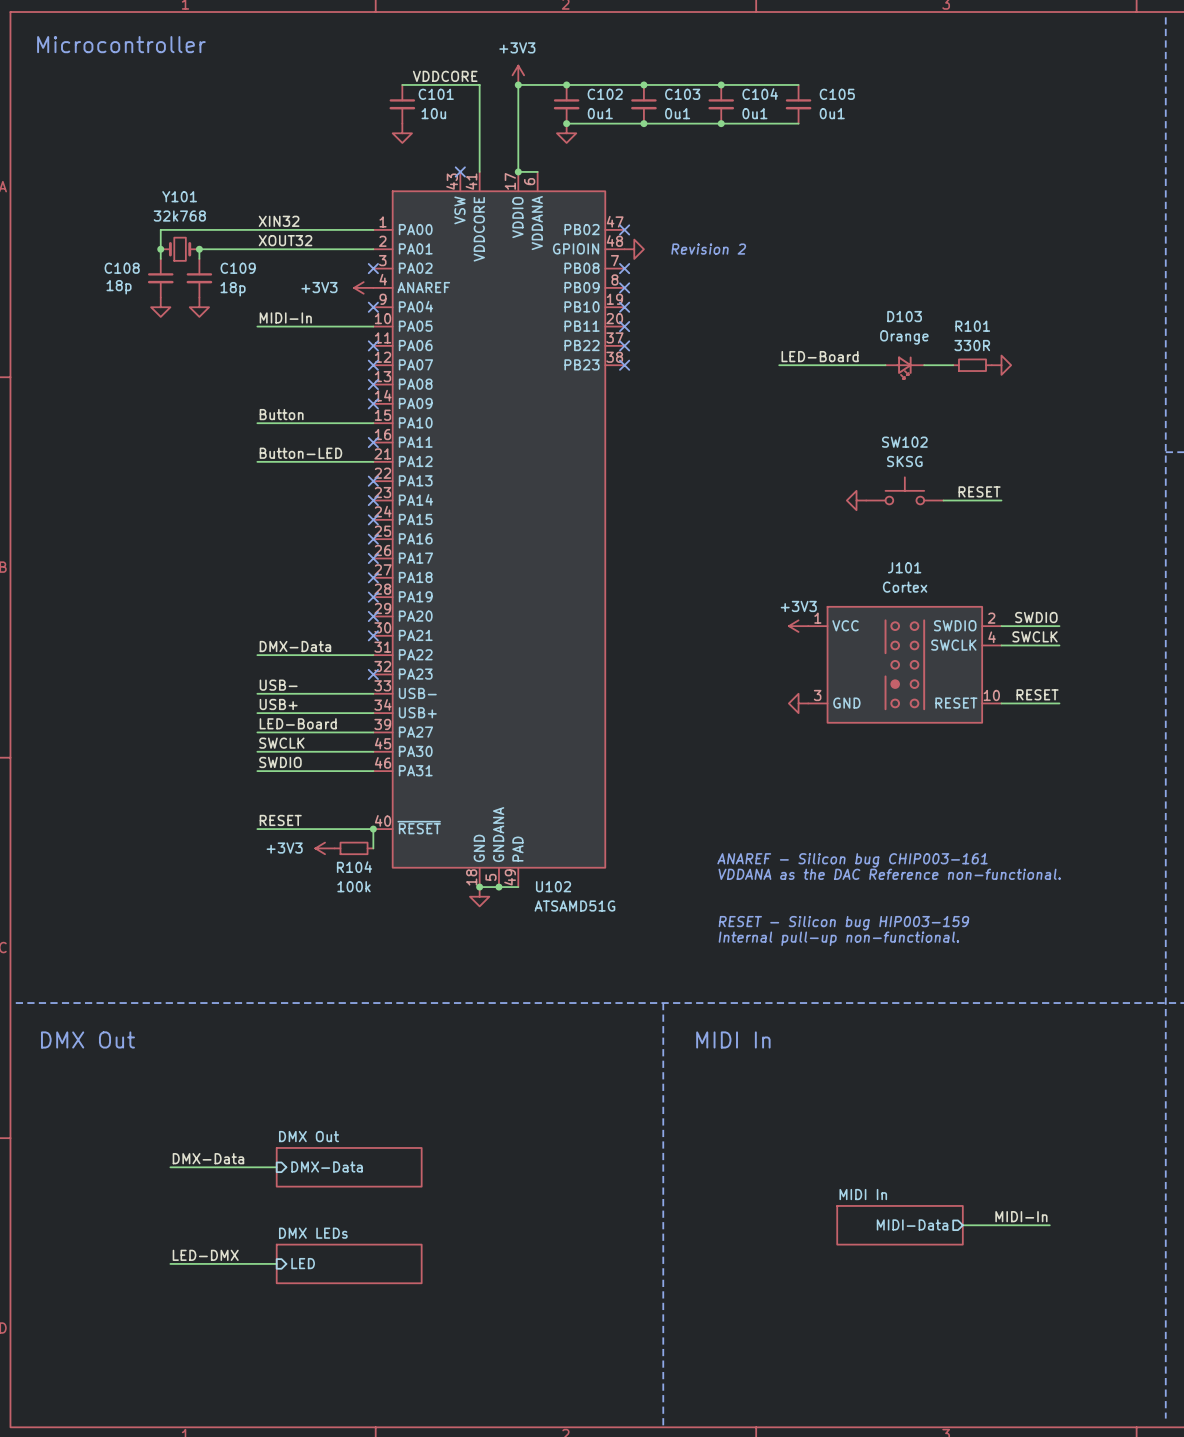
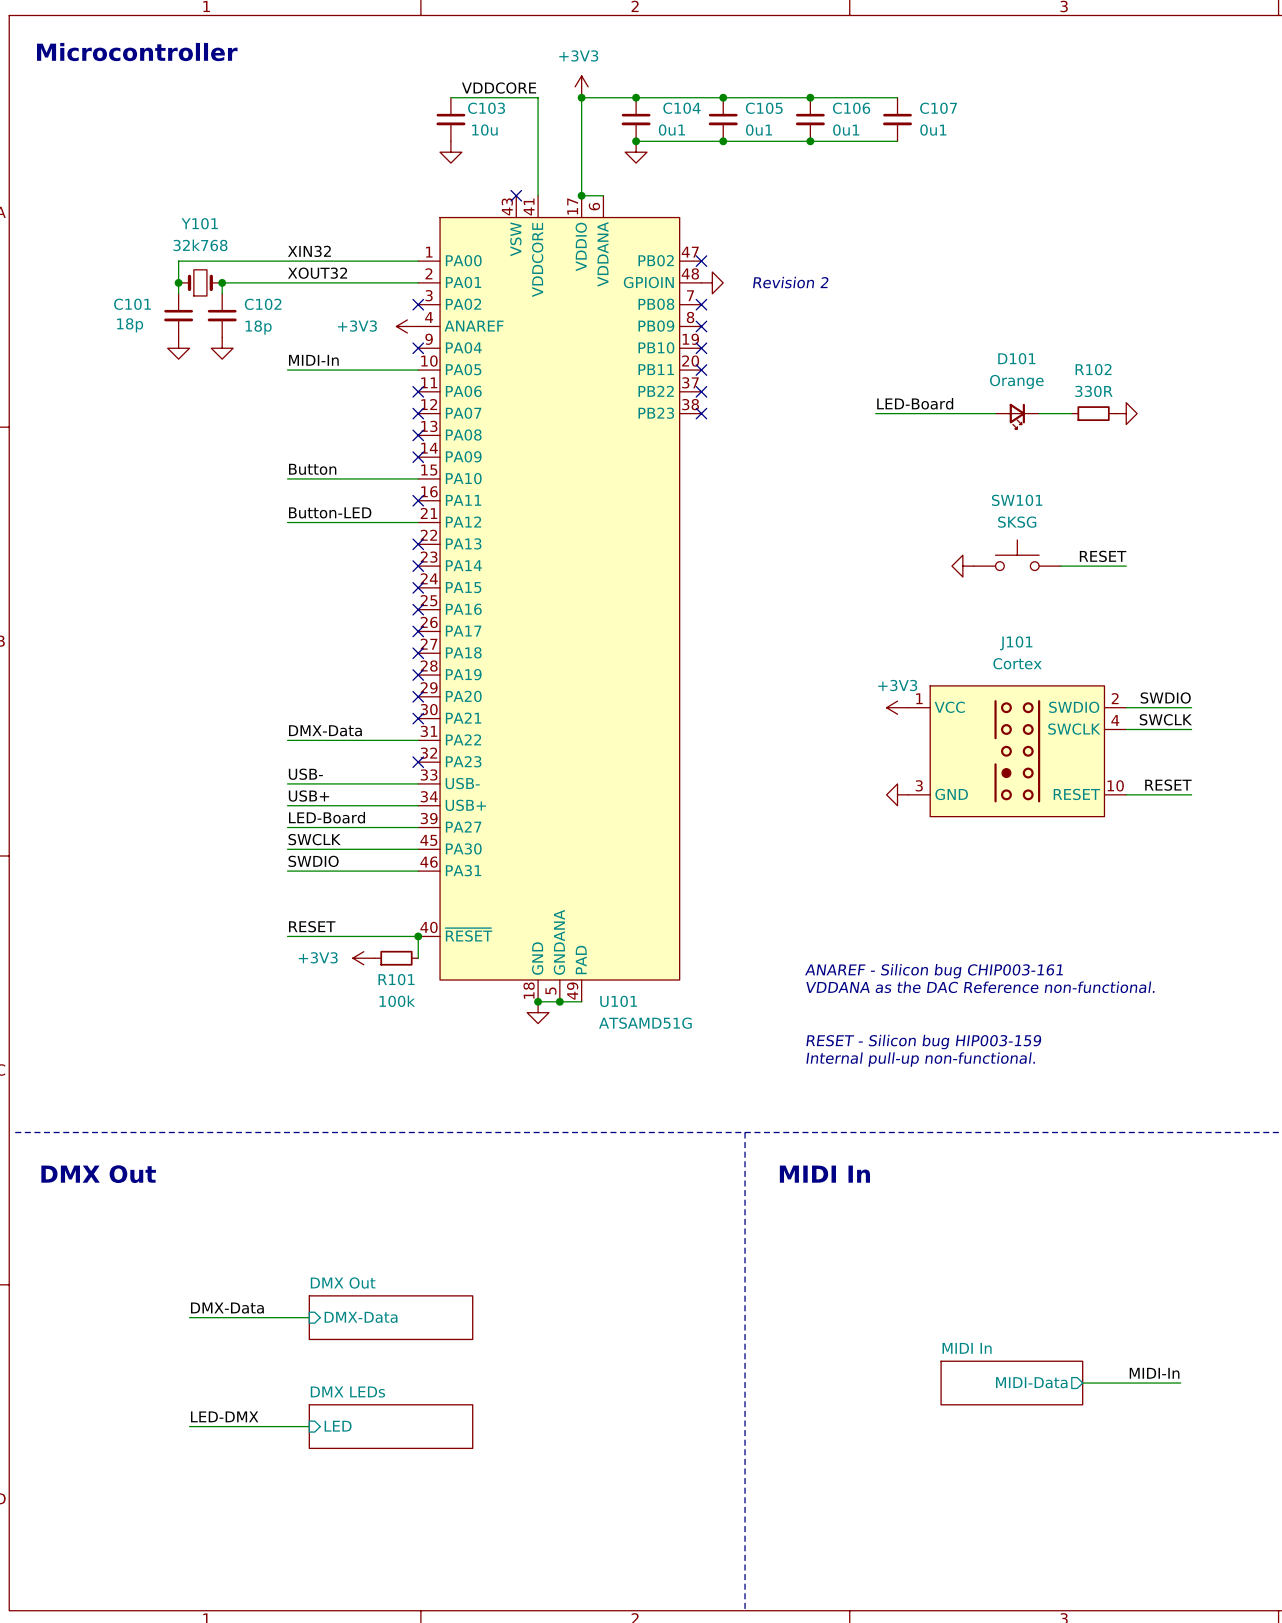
C101 name: C101 (436, 94) -> C103 (486, 108)
C102 name: C102 (605, 94) -> C104 (681, 108)
C103 name: C103 (682, 94) -> C105 (764, 108)
C104 name: C104 (760, 94) -> C106 (851, 108)
C105 name: C105 (837, 94) -> C107 (938, 108)
C108 name: C108 (122, 268) -> C101 (132, 304)
C109 name: C109 (238, 268) -> C102 (263, 304)
D103 name: D103 (904, 316) -> D101 (1016, 358)
R101 name: R101 (972, 326) -> R102 (1093, 369)
SW102 name: SW102 (904, 442) -> SW101 (1017, 500)
R104 name: R104 (354, 867) -> R101 (396, 979)
U102 name: U102 (553, 886) -> U101 (618, 1001)

